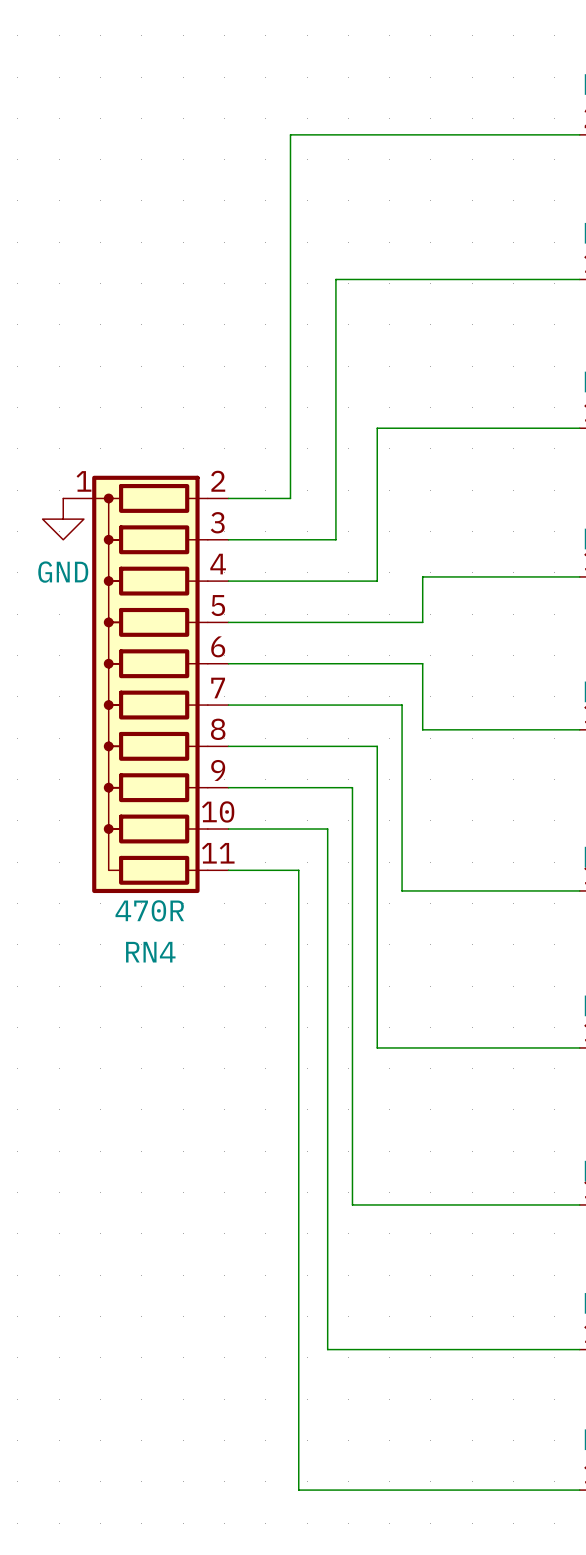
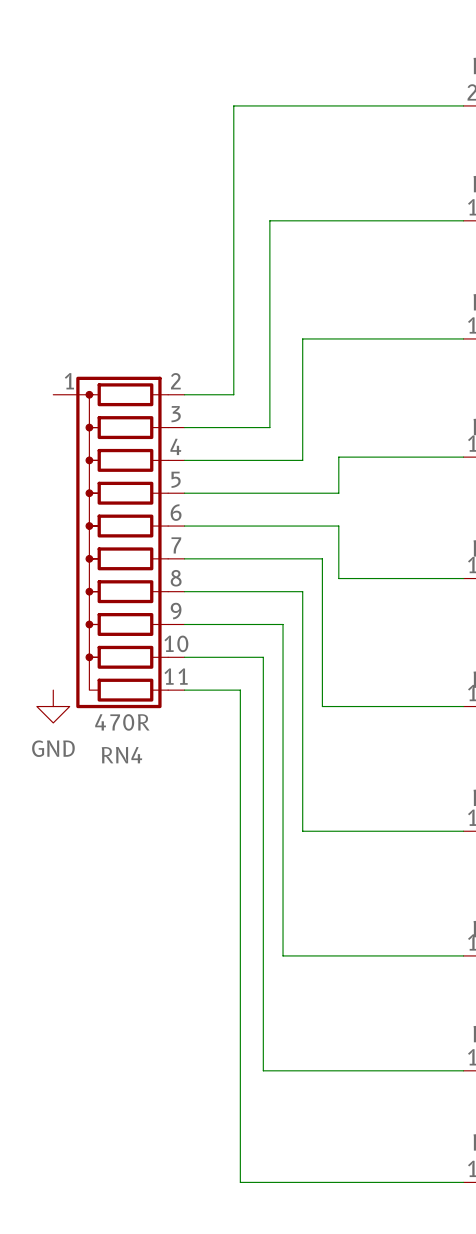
power symbol position: GND (63, 519) -> GND (53, 706)

